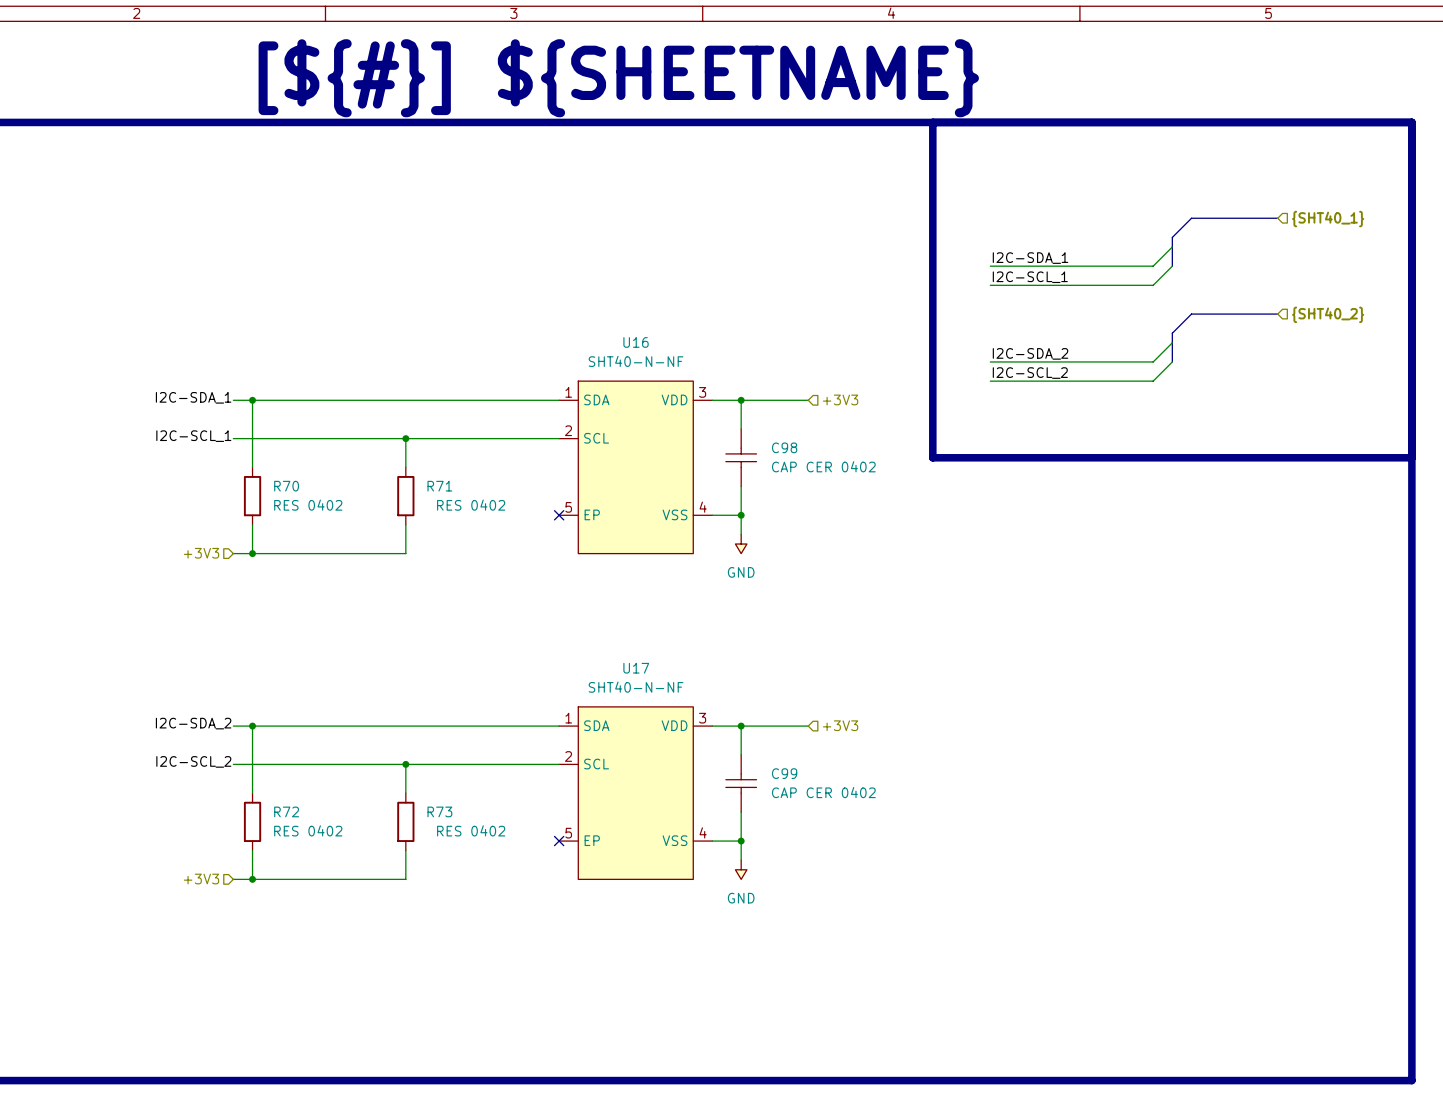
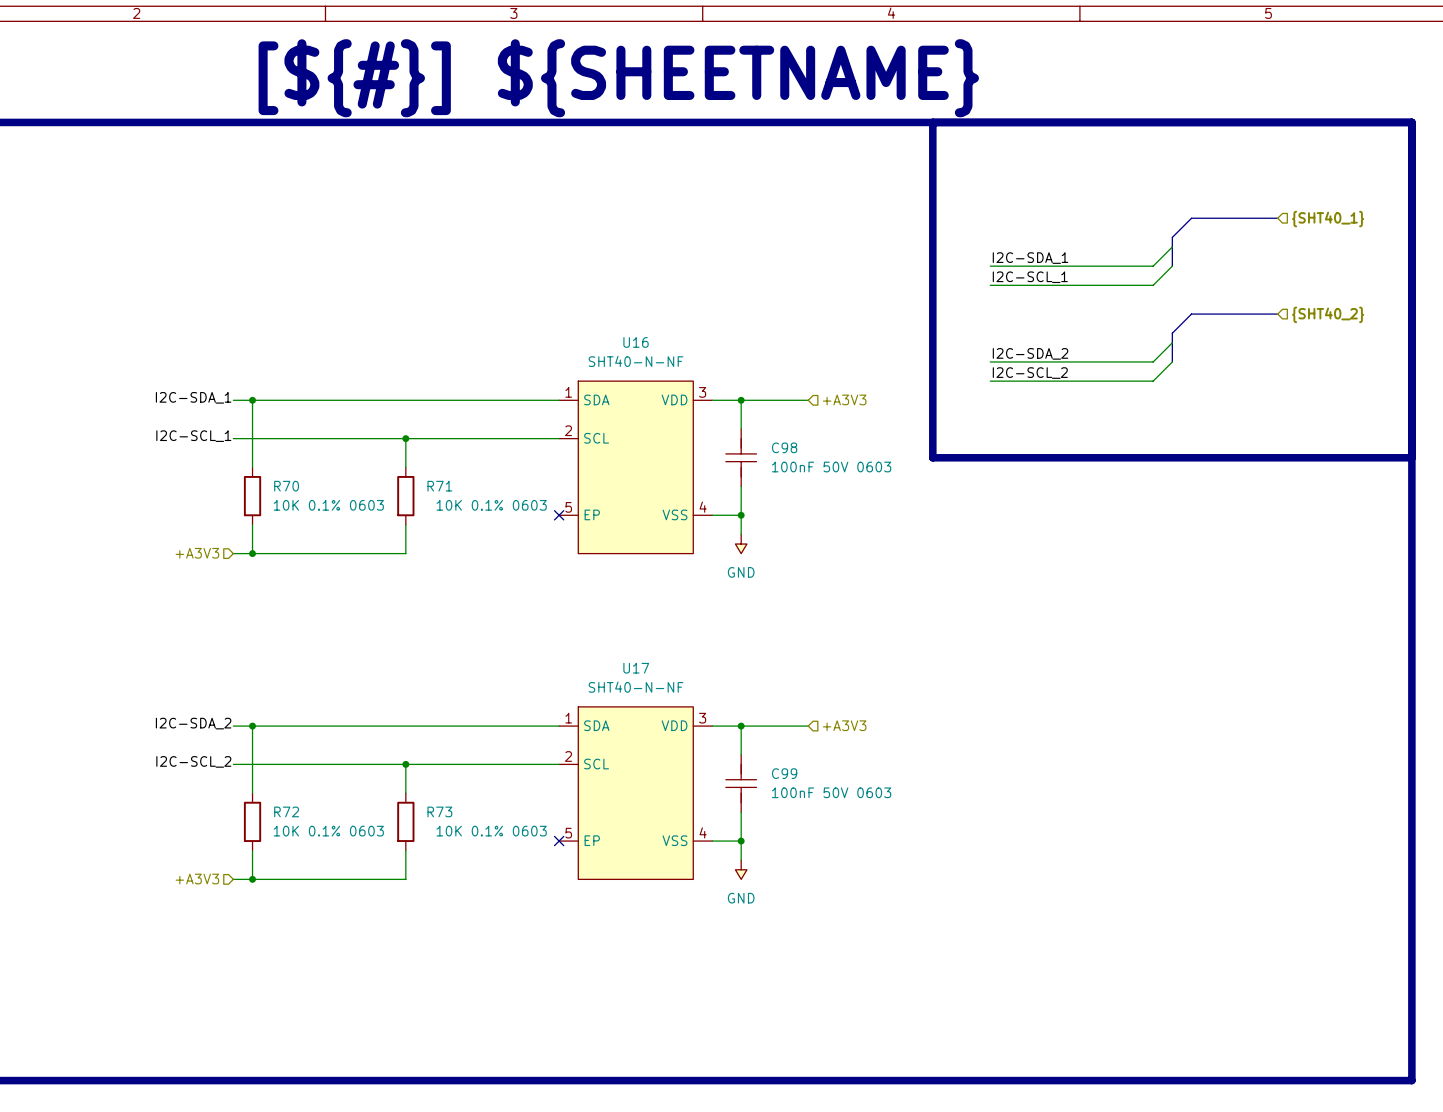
hierarchical label: +3V3 (840, 399) -> +A3V3 (844, 399)
C98 symbol: [725, 429, 757, 487] -> [725, 429, 757, 487]
C98 value: CAP CER 0402 (823, 466) -> 100nF 50V 0603 (831, 467)
R70 value: RES 0402 (308, 505) -> 10K 0.1% 0603 (328, 505)
R71 value: RES 0402 (471, 505) -> 10K 0.1% 0603 (491, 505)
hierarchical label: +3V3 (201, 553) -> +A3V3 (197, 553)
hierarchical label: +3V3 (840, 725) -> +A3V3 (844, 725)
C99 symbol: [725, 754, 757, 813] -> [725, 754, 757, 813]
C99 value: CAP CER 0402 (823, 792) -> 100nF 50V 0603 (831, 792)
R72 value: RES 0402 (308, 830) -> 10K 0.1% 0603 (328, 831)
R73 value: RES 0402 (471, 830) -> 10K 0.1% 0603 (491, 831)
hierarchical label: +3V3 (201, 879) -> +A3V3 (197, 879)

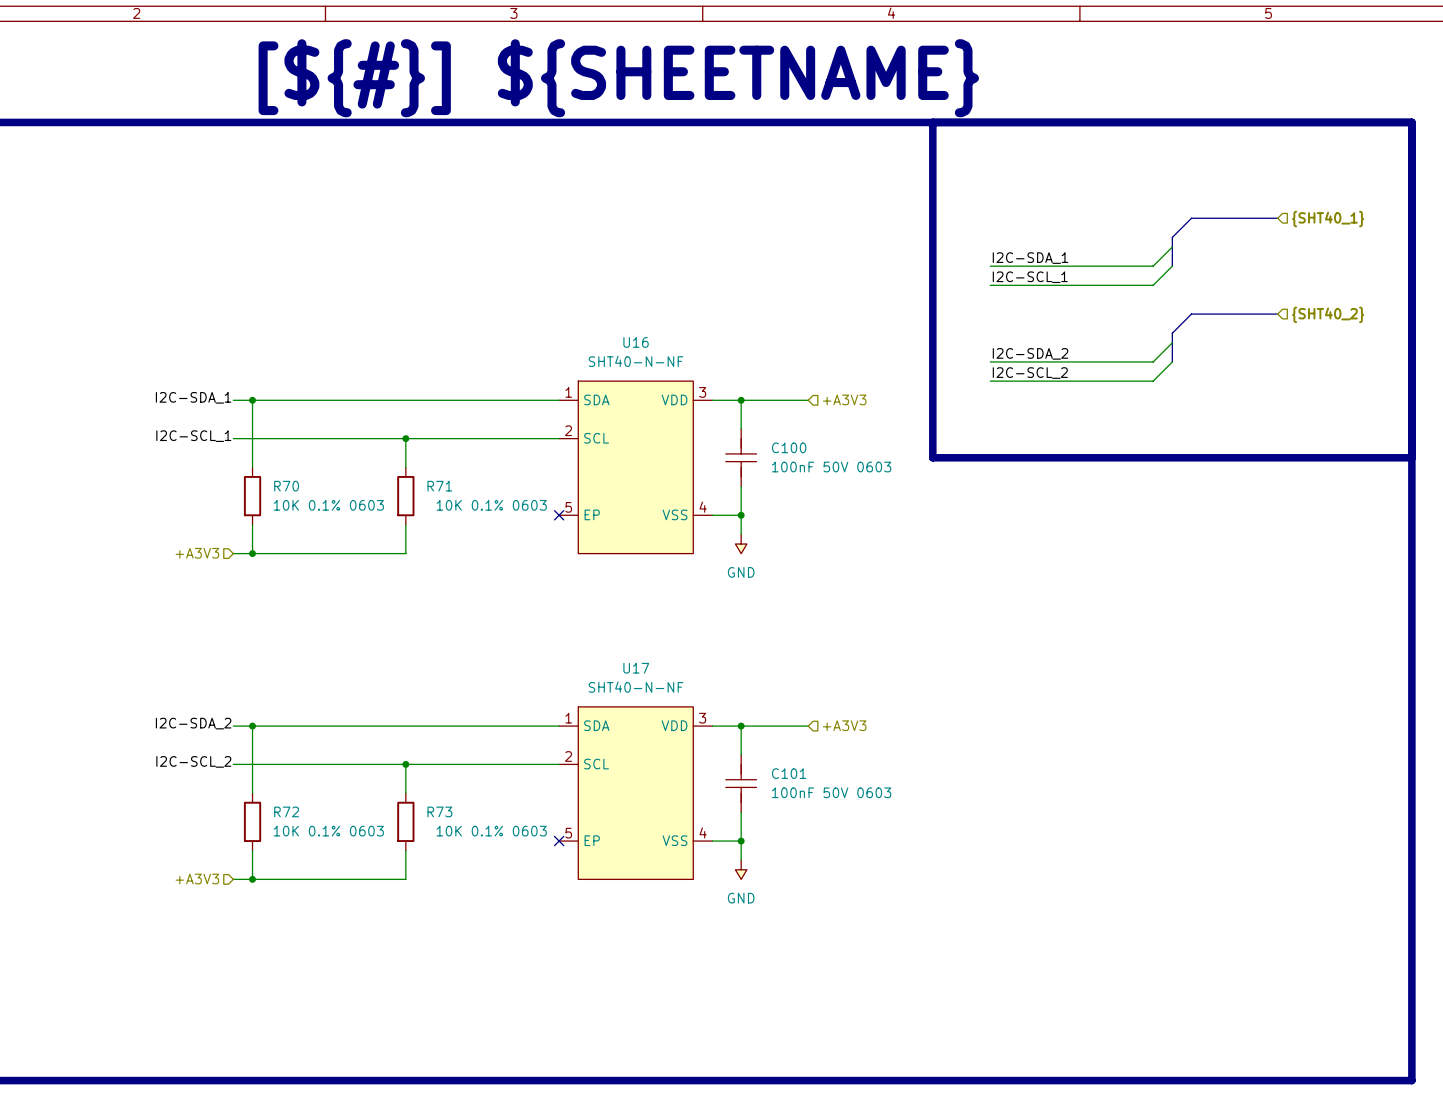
C98 name: C98 (784, 447) -> C100 (789, 447)
C99 name: C99 (784, 773) -> C101 (789, 773)

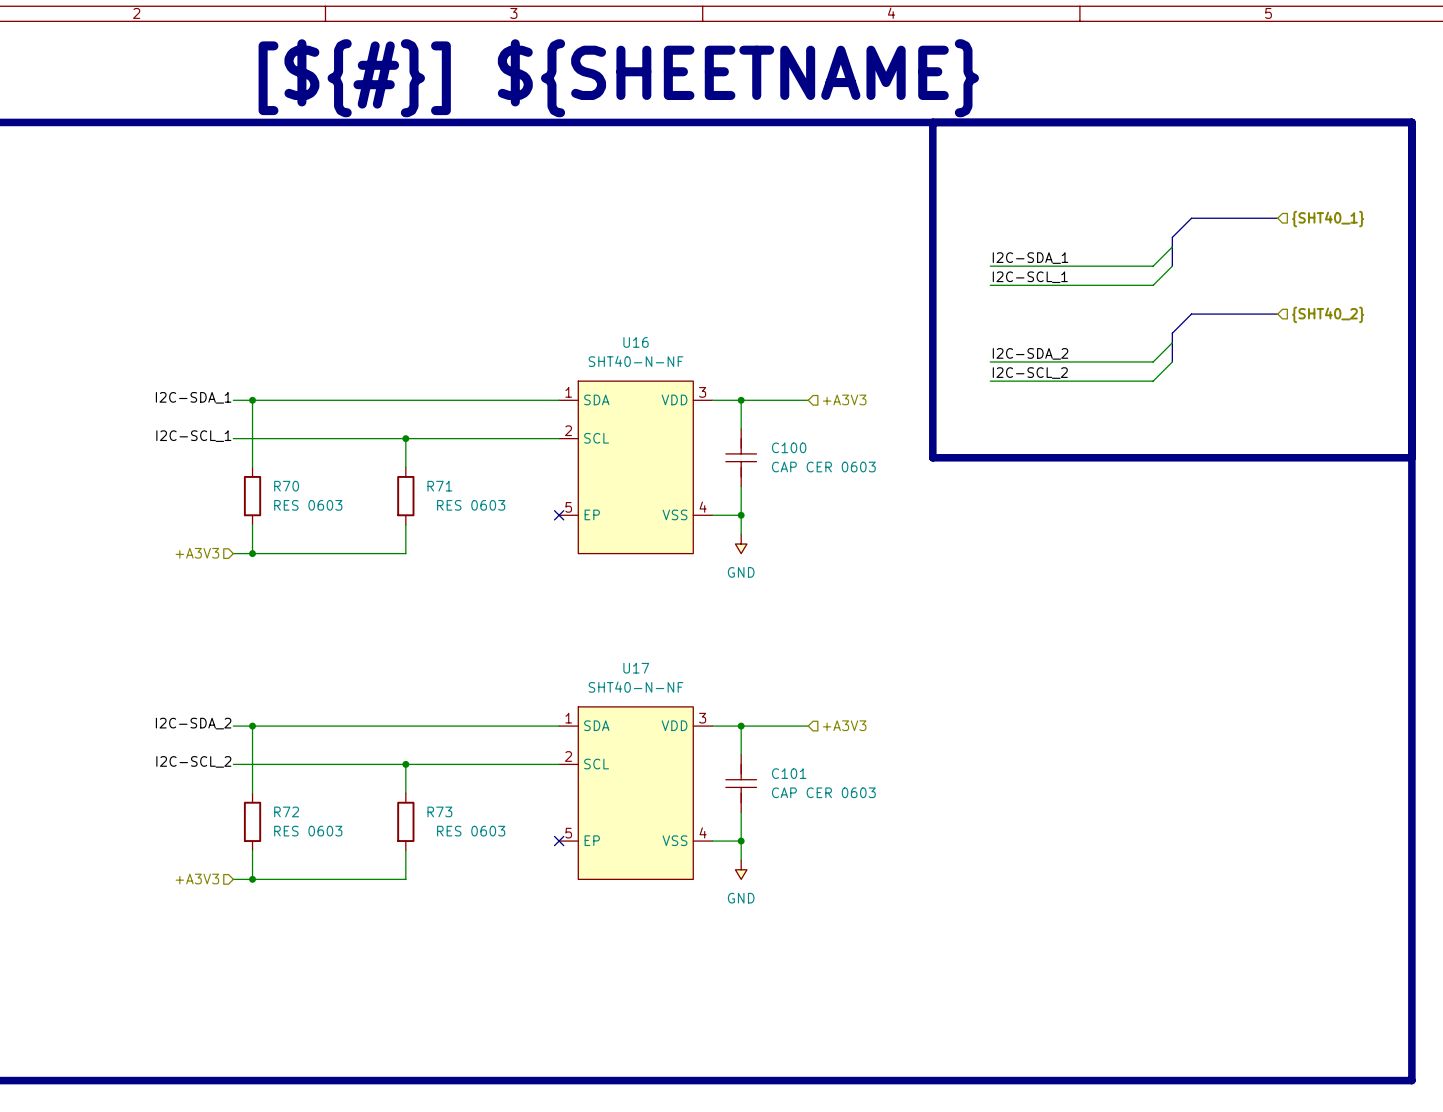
C100 value: 100nF 50V 0603 (831, 467) -> CAP CER 0603 (823, 467)
R70 value: 10K 0.1% 0603 (328, 505) -> RES 0603 (308, 505)
R71 value: 10K 0.1% 0603 (491, 505) -> RES 0603 (471, 505)
C101 value: 100nF 50V 0603 (831, 792) -> CAP CER 0603 (823, 792)
R72 value: 10K 0.1% 0603 (328, 831) -> RES 0603 (308, 831)
R73 value: 10K 0.1% 0603 (491, 831) -> RES 0603 (471, 831)

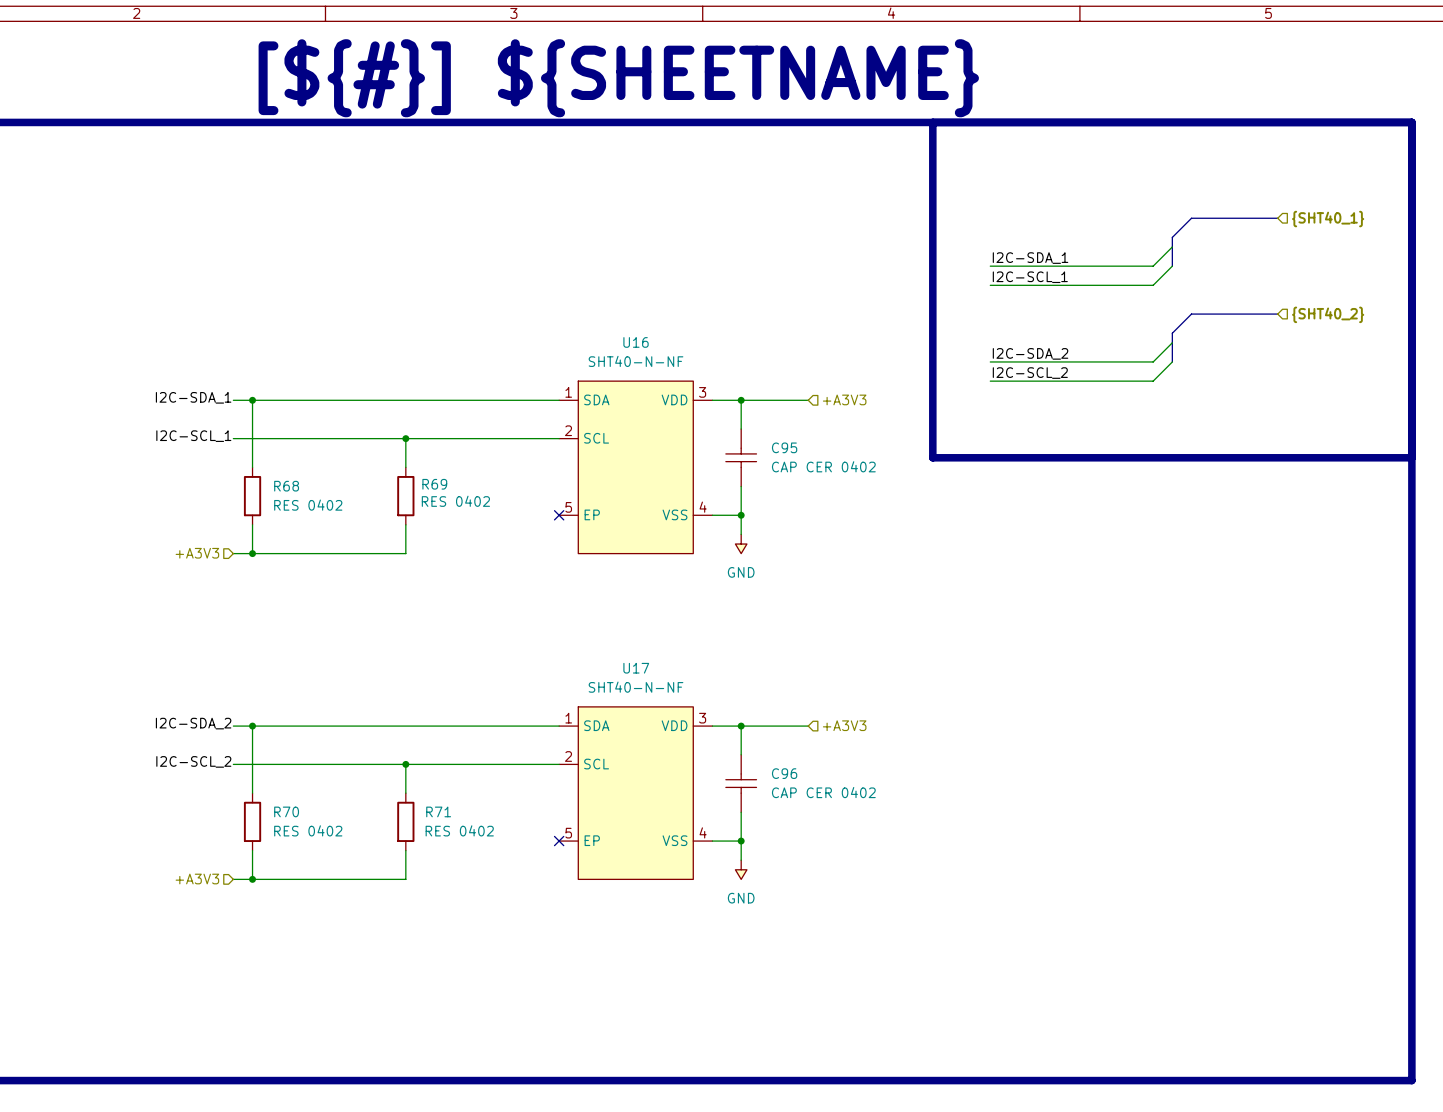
C100: CAP CER 0603 (741, 457) -> none
C95: none -> CAP CER 0402 (741, 457)
R70 name: R70 (286, 486) -> R68 (286, 486)
R71 name: R71 (439, 486) -> R69 (434, 484)
R70 value: RES 0603 (308, 505) -> RES 0402 (308, 505)
R71 value: RES 0603 (471, 505) -> RES 0402 (455, 501)
C101: CAP CER 0603 (741, 783) -> none
C96: none -> CAP CER 0402 (741, 783)
R72 name: R72 (286, 811) -> R70 (286, 811)
R73 name: R73 (439, 811) -> R71 (438, 811)
R72 value: RES 0603 (308, 831) -> RES 0402 (308, 830)
R73 value: RES 0603 (471, 831) -> RES 0402 (459, 830)

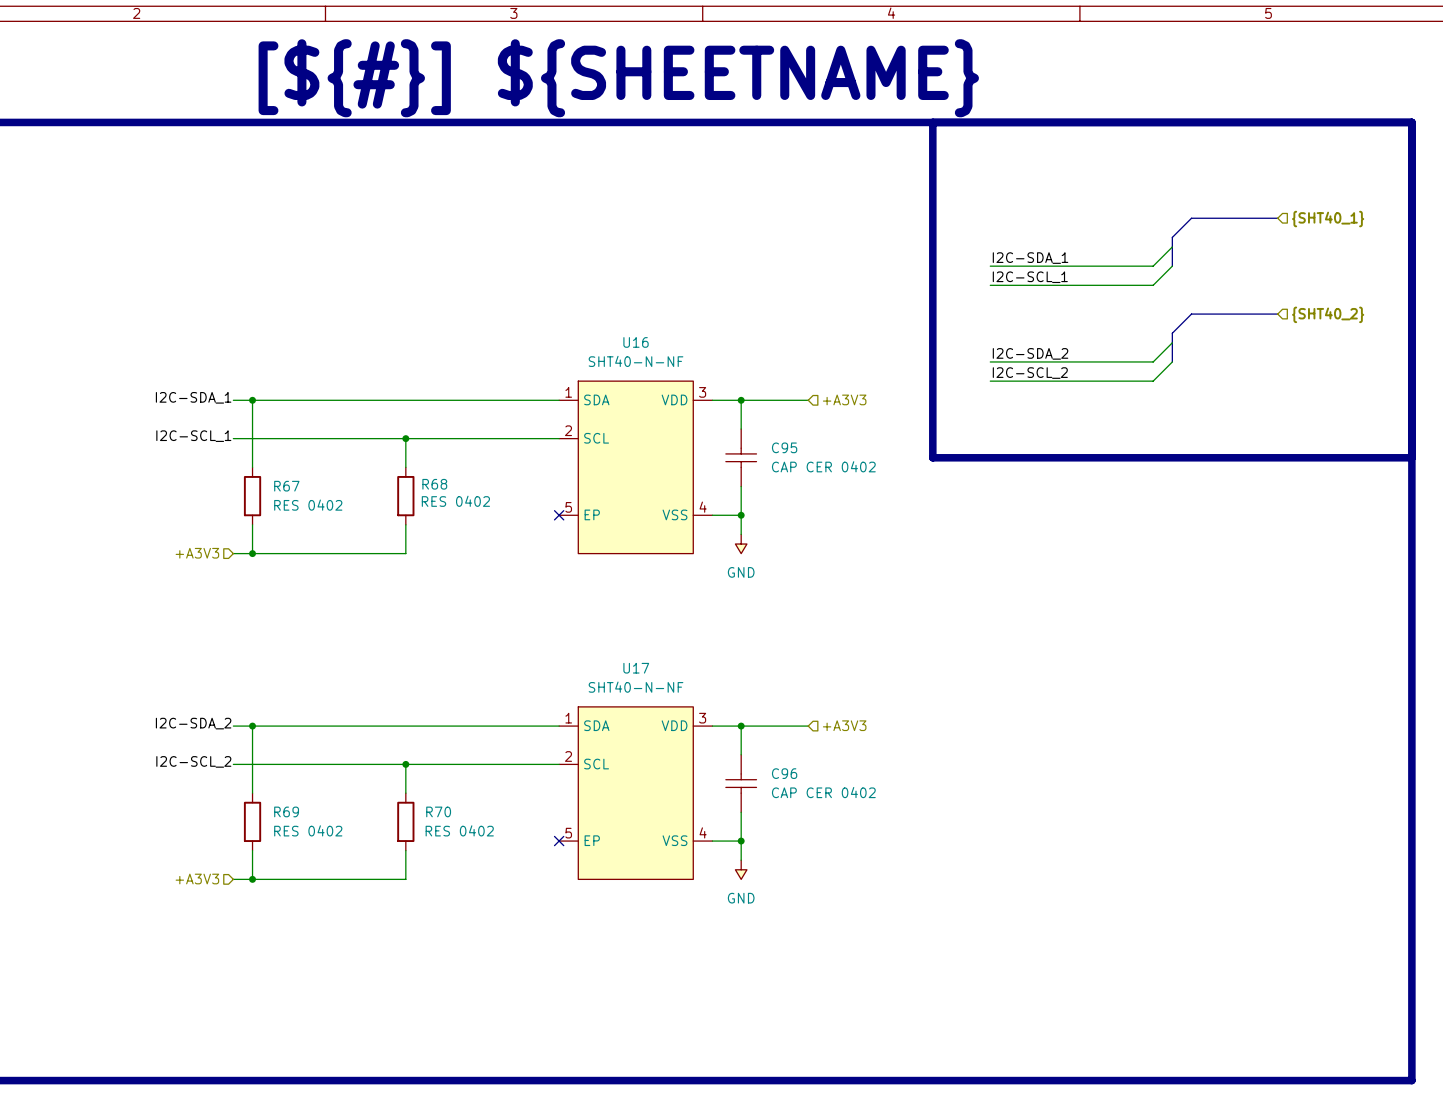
R69 name: R69 (434, 484) -> R68 (434, 484)
R68 name: R68 (286, 486) -> R67 (286, 486)
R70 name: R70 (286, 811) -> R69 (286, 811)
R71 name: R71 (438, 811) -> R70 (438, 811)

